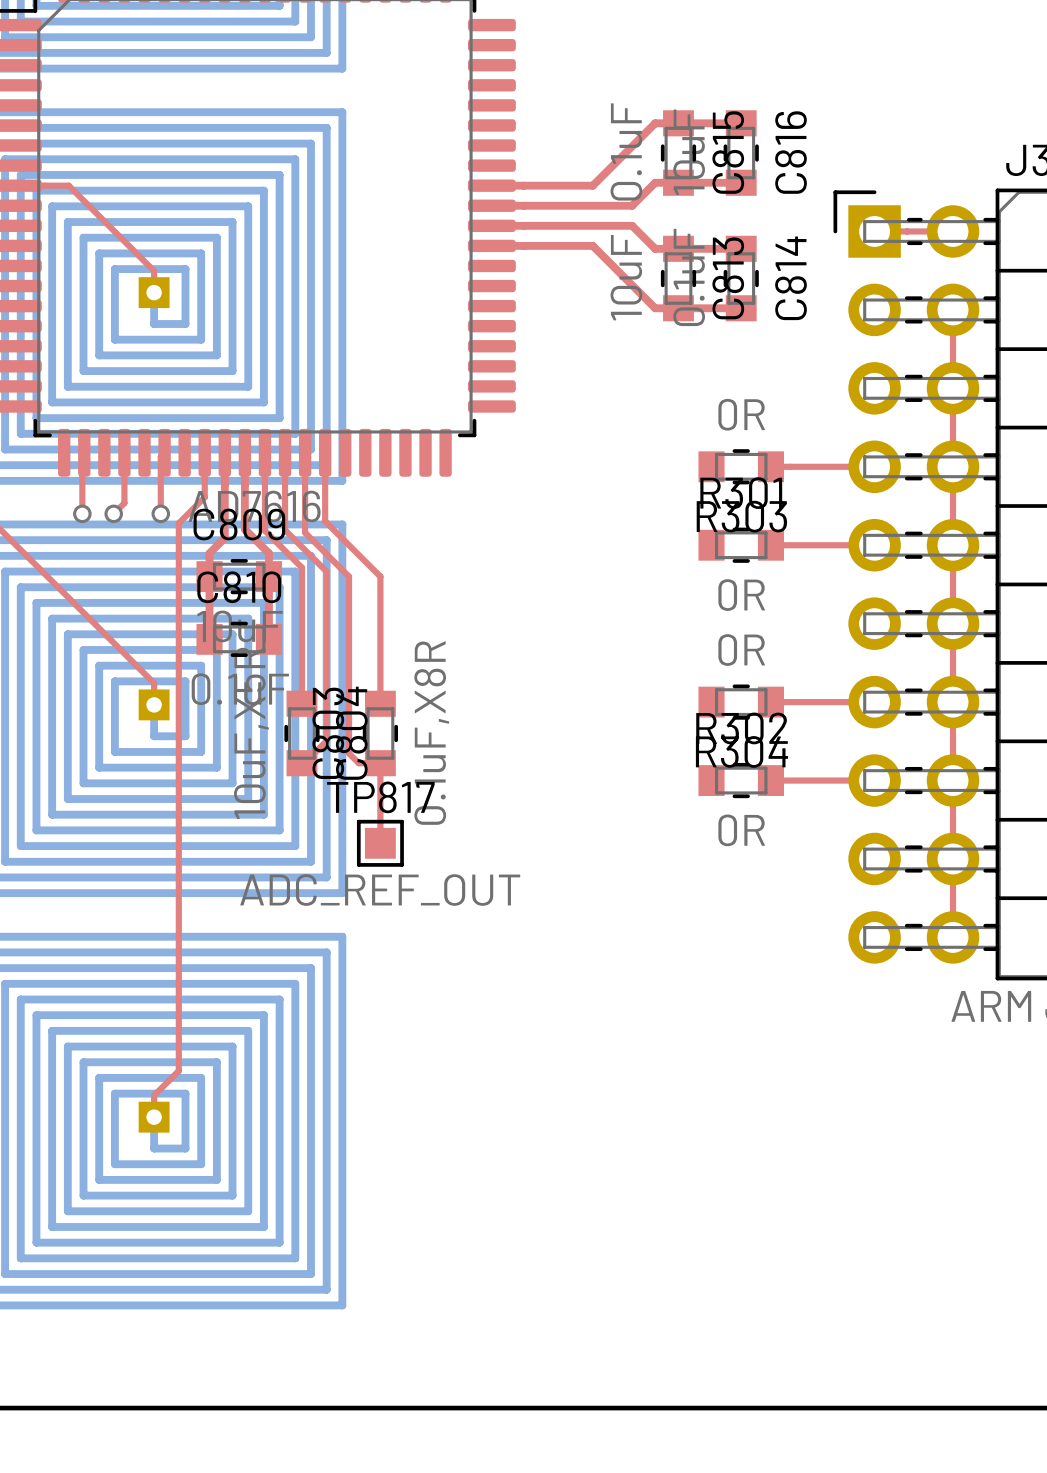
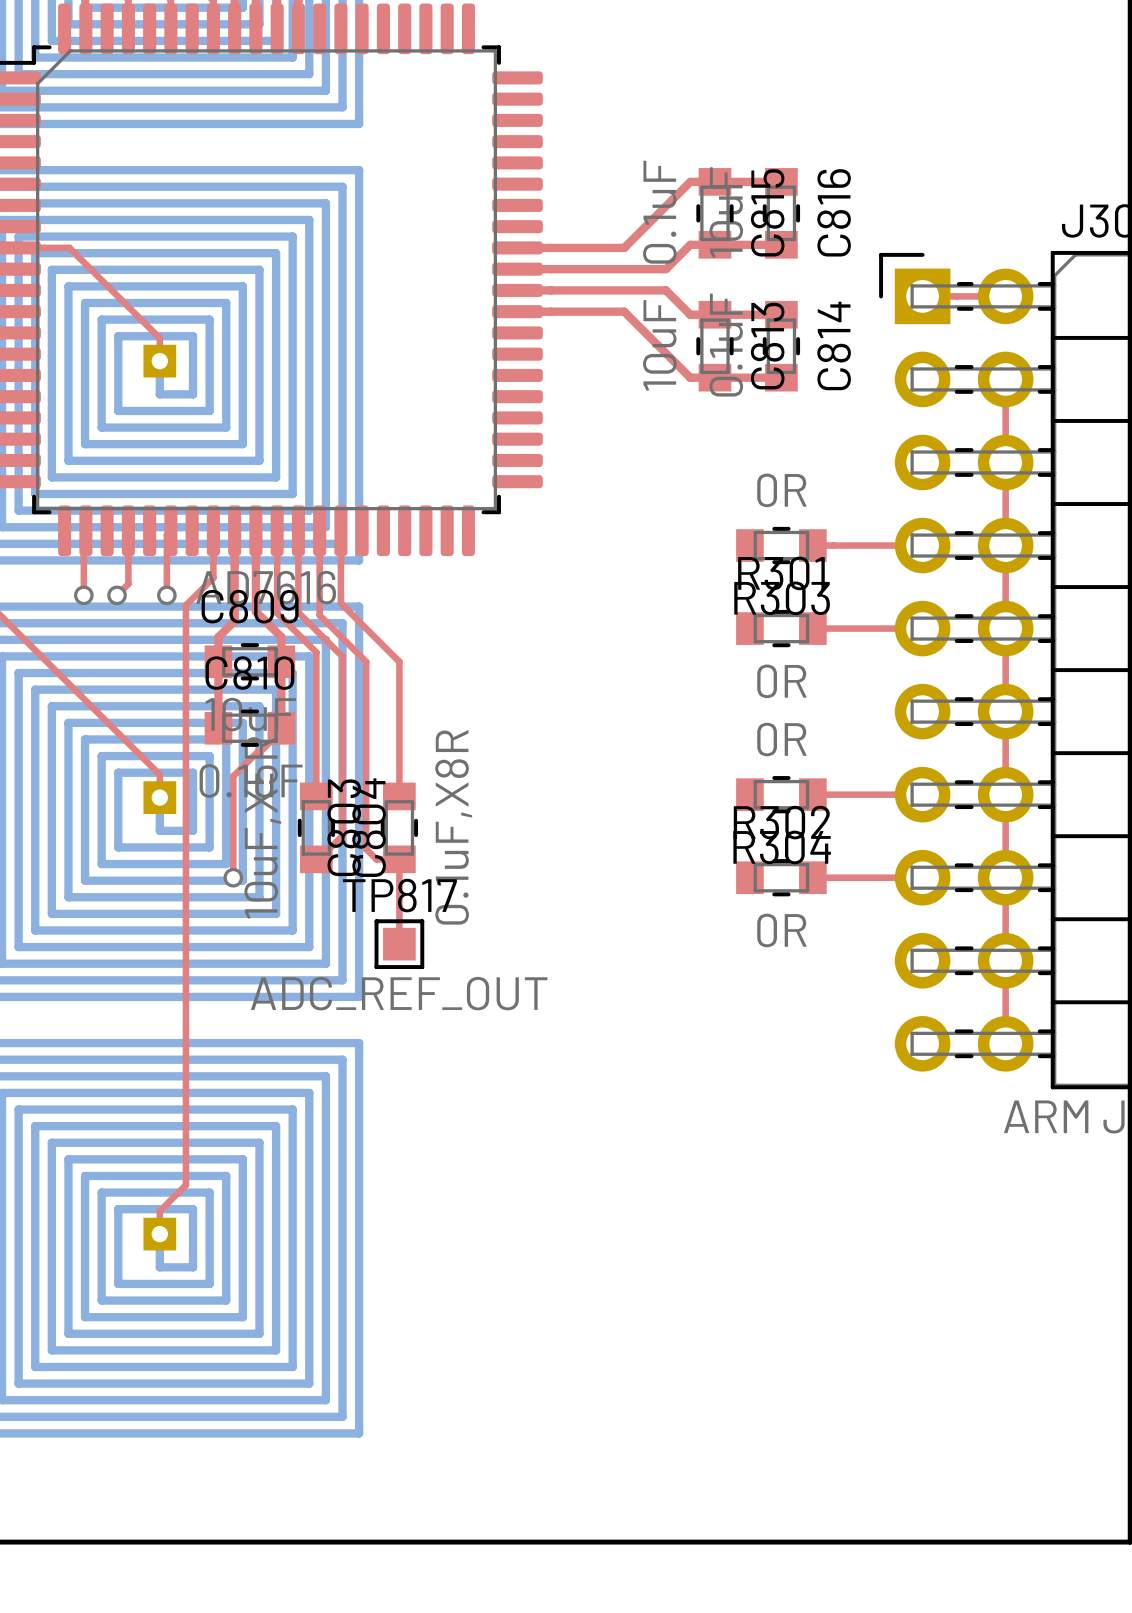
top track: none -> (281, 728) (281, 730) (261, 751) (258, 751) (233, 776) (233, 877)
via: none -> (233, 877)

